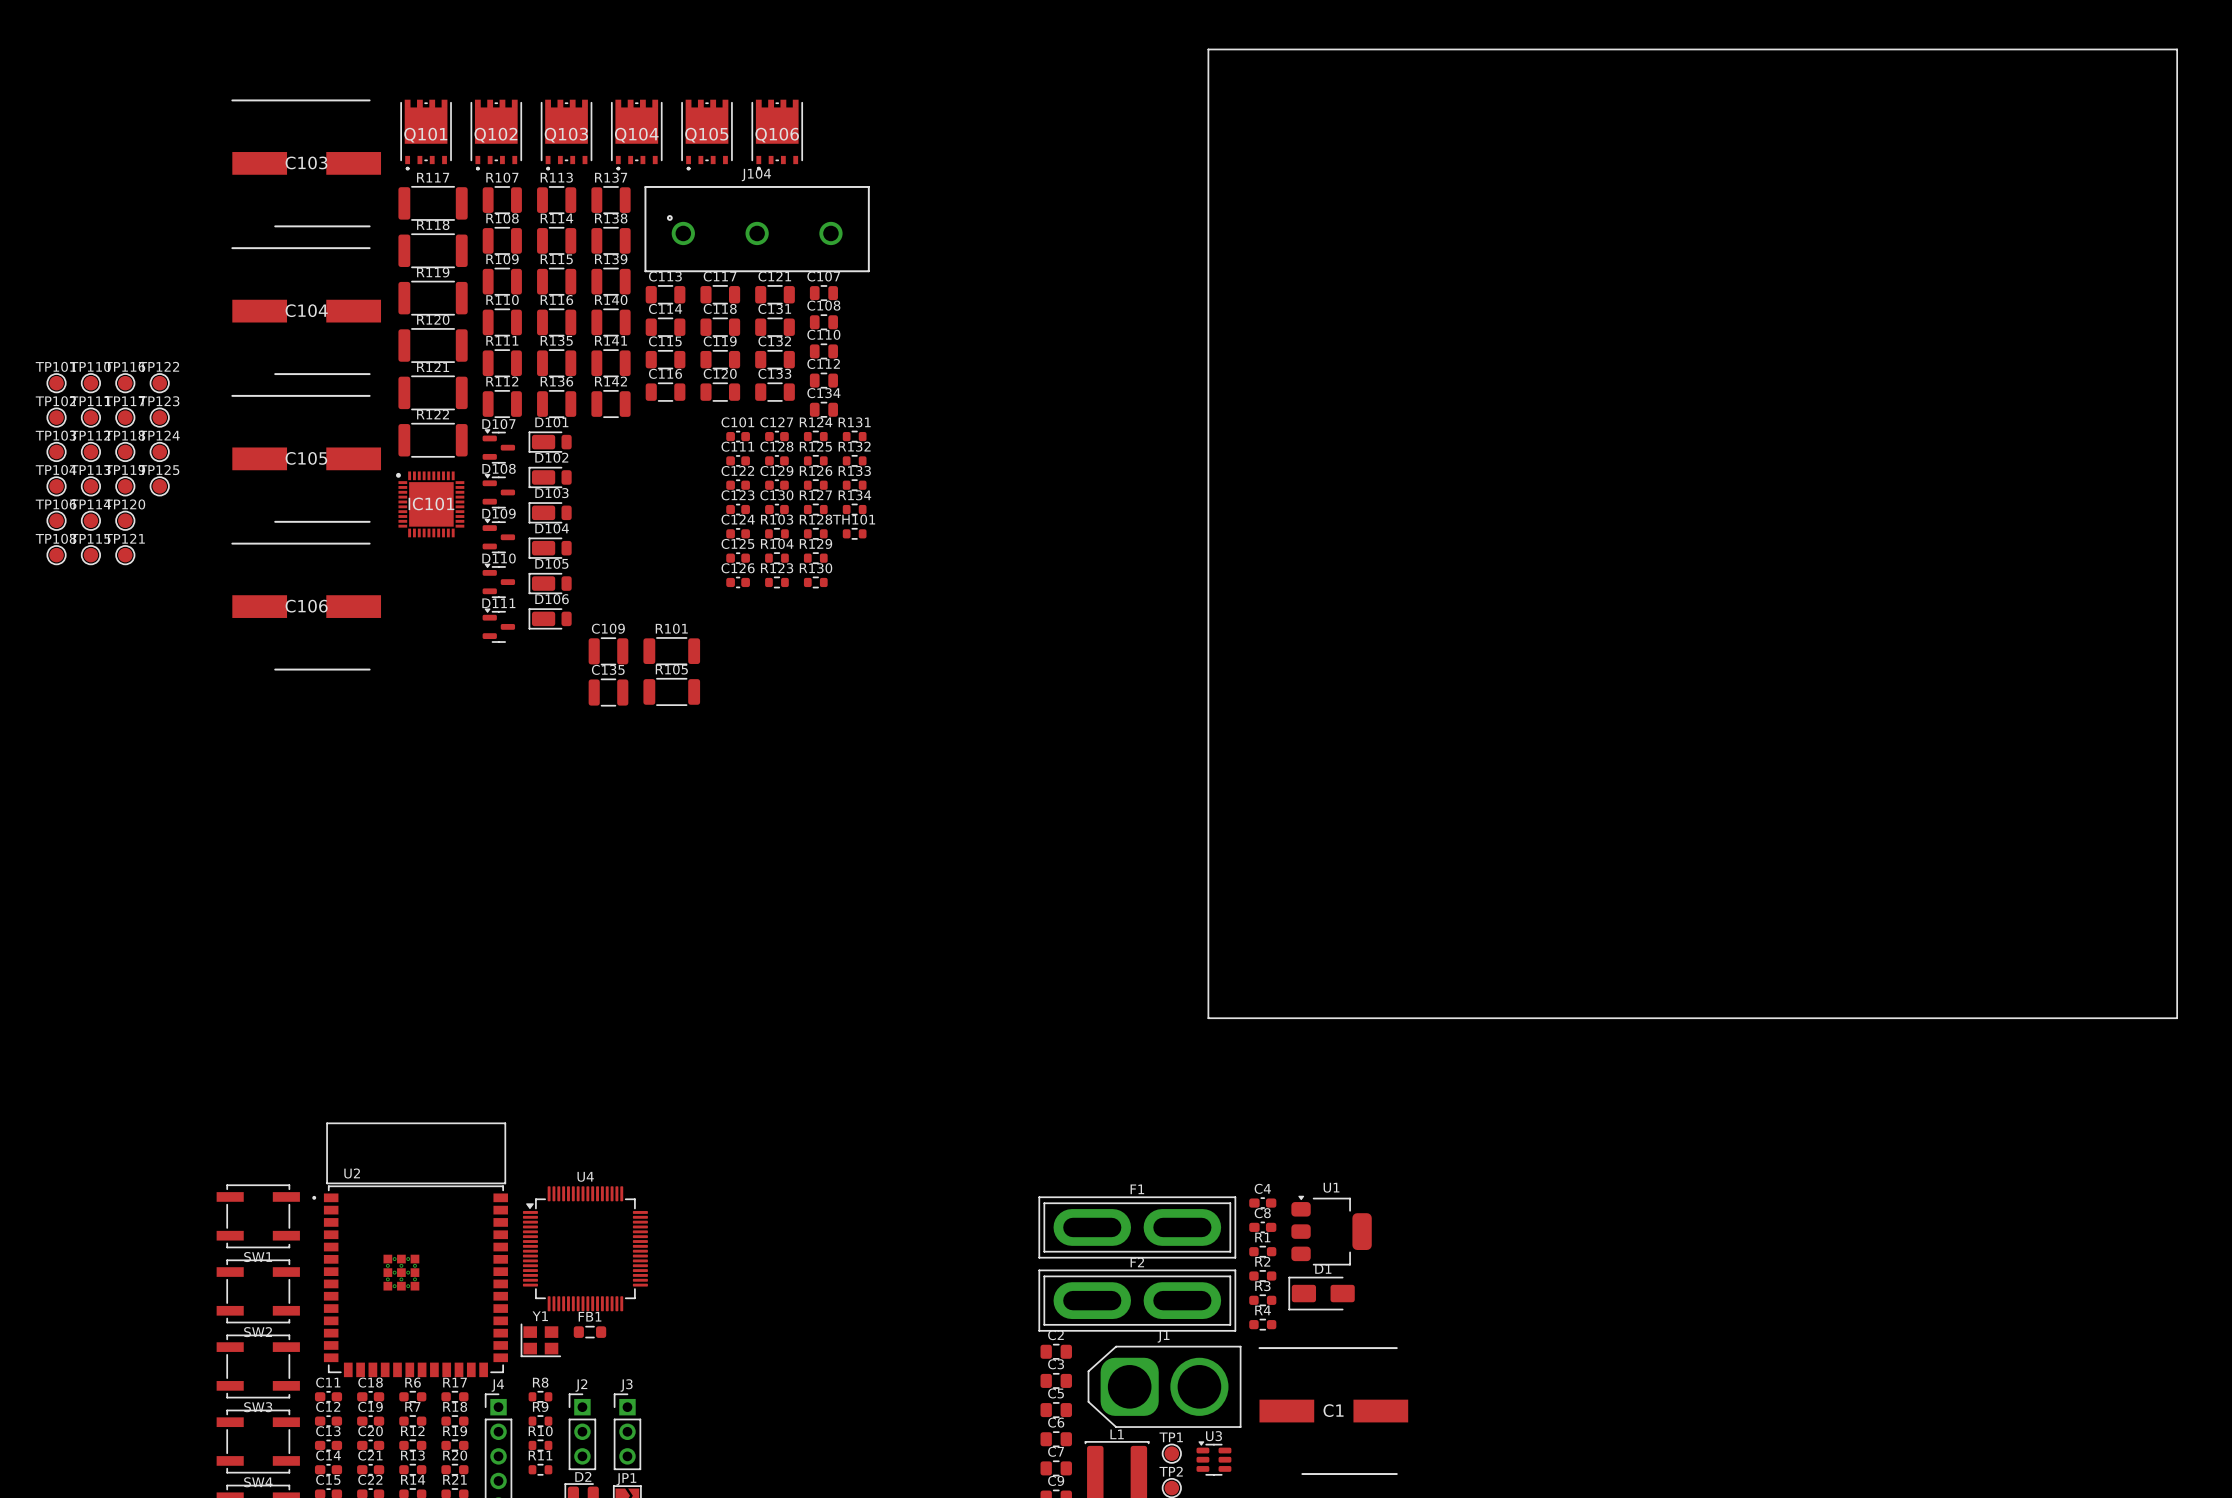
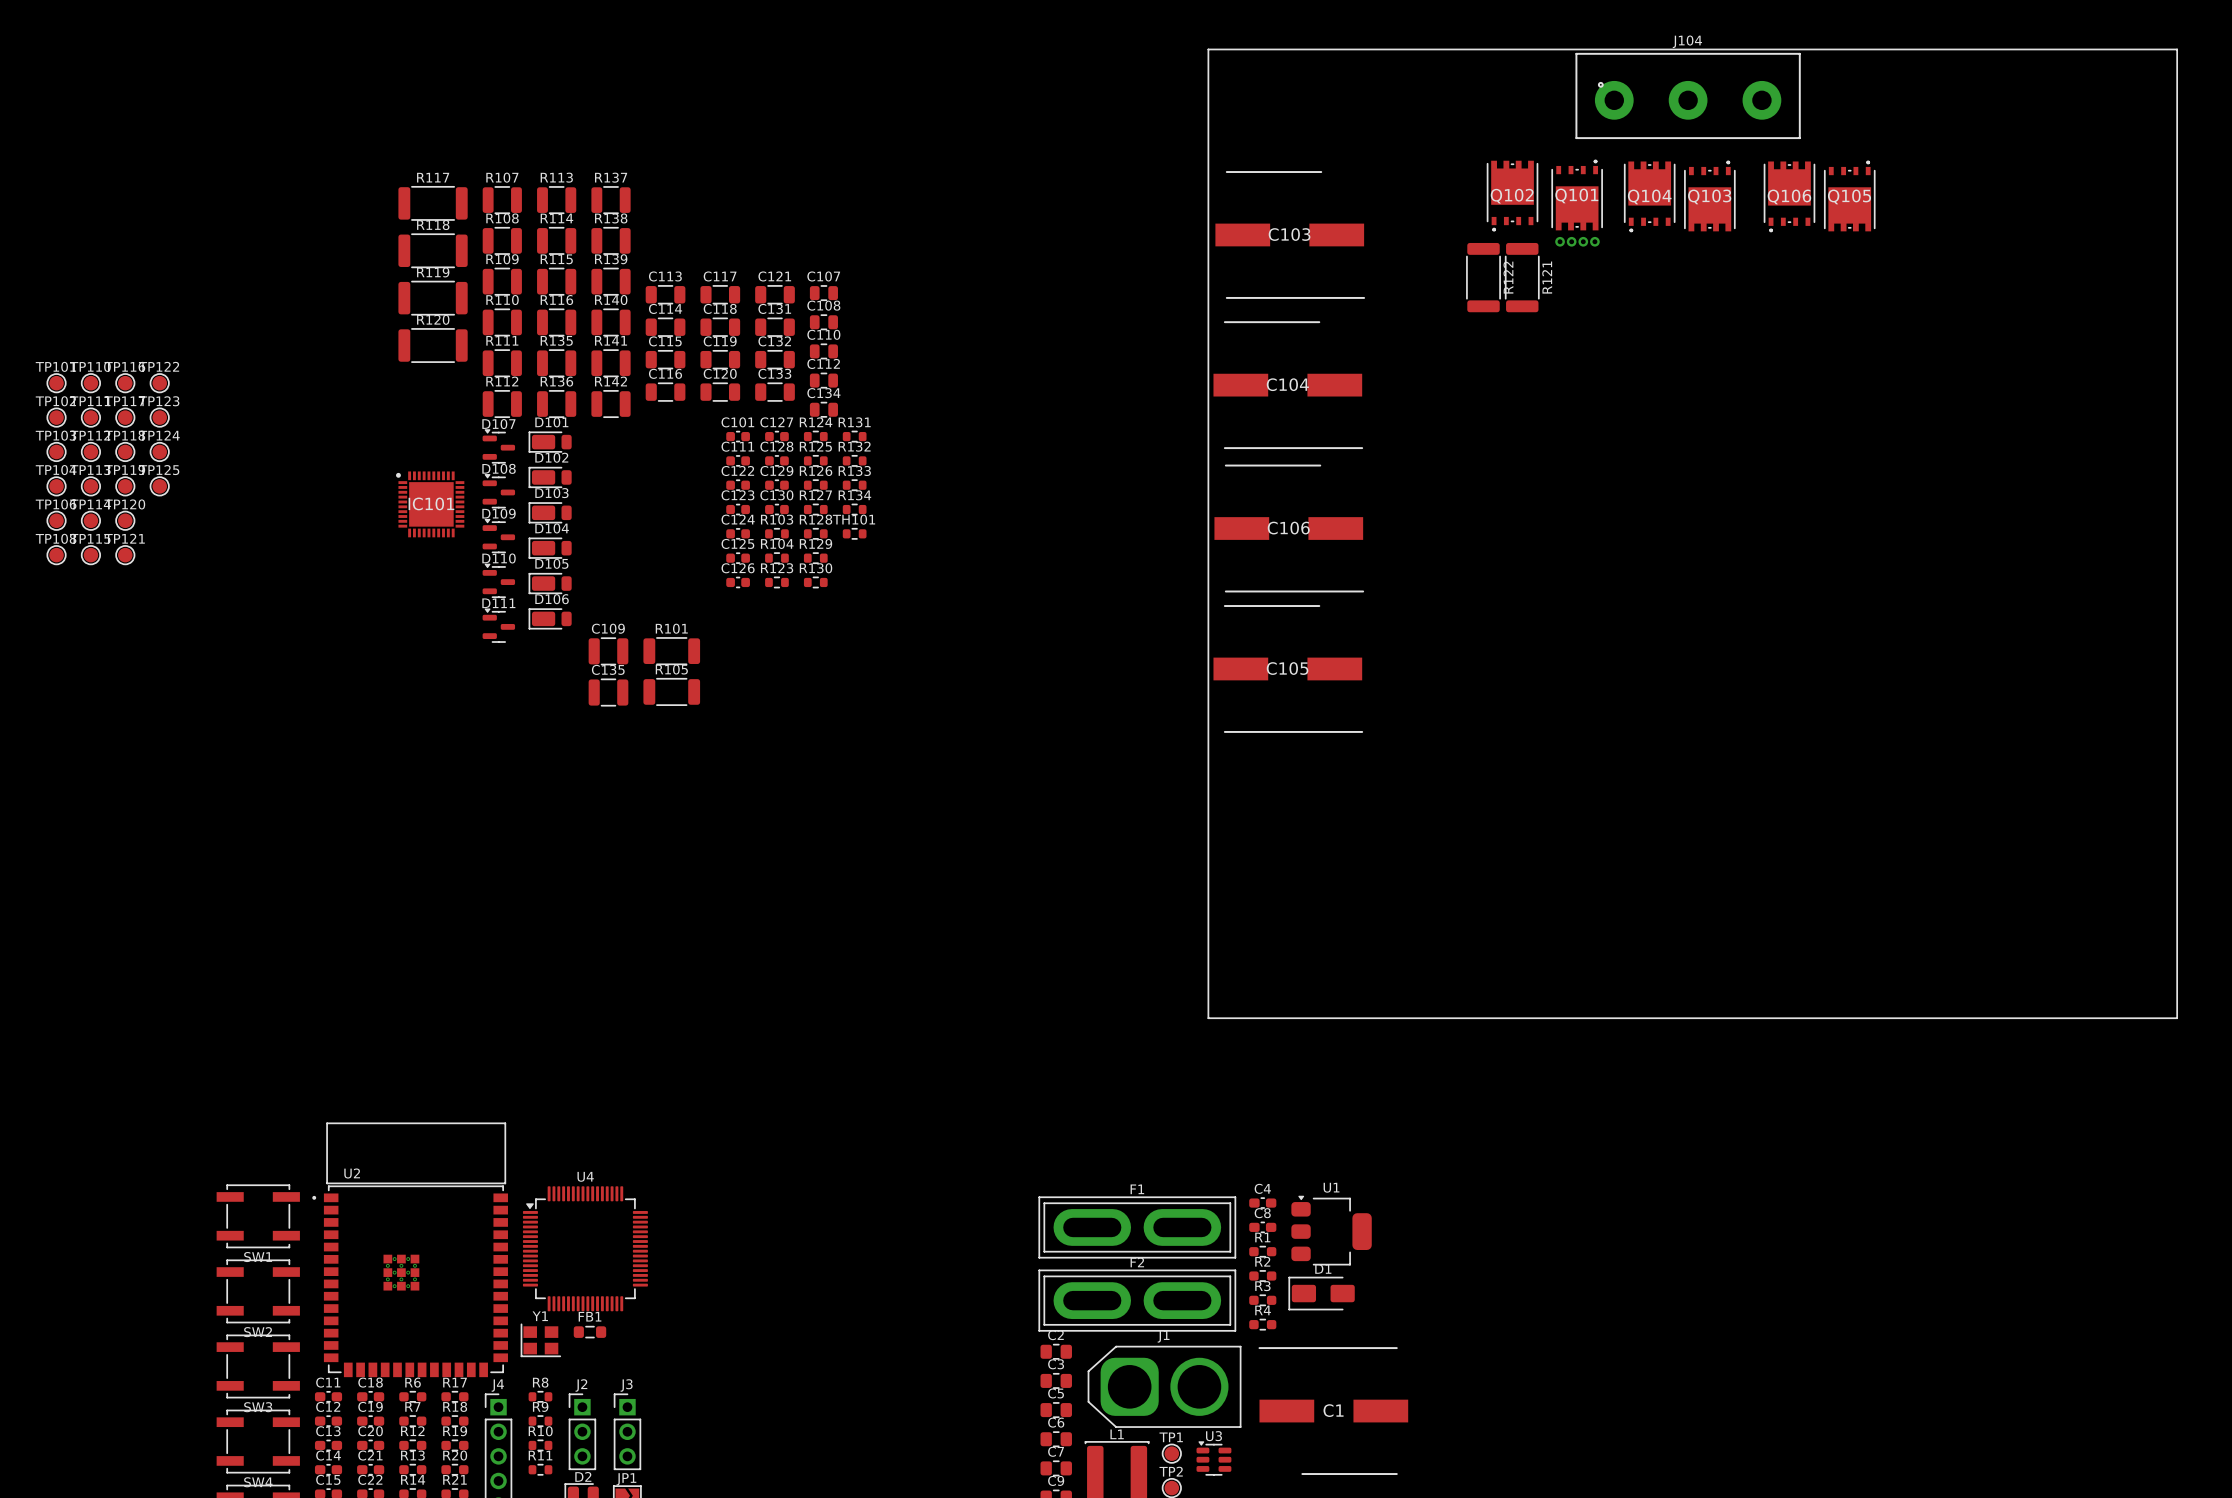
Q101 rotation: 0° (426, 135) -> 180° (1577, 194)
Q101 position: (426, 135) -> (1577, 194)
Q102 position: (496, 135) -> (1512, 196)
Q103 rotation: 0° (566, 135) -> 180° (1709, 195)
Q103 position: (566, 135) -> (1709, 195)
Q104 position: (636, 135) -> (1649, 196)
Q105 rotation: 0° (707, 135) -> 180° (1849, 195)
Q105 position: (707, 135) -> (1849, 195)
Q106 position: (777, 135) -> (1789, 196)
C103 rotation: 0° (306, 163) -> 180° (1290, 234)
C103 position: (306, 163) -> (1290, 234)
J104 footprint: [644, 186, 870, 273] -> [1575, 52, 1801, 140]
via: none -> (1560, 241)
via: none -> (1571, 241)
via: none -> (1583, 241)
via: none -> (1594, 241)
C104 rotation: 0° (306, 311) -> 180° (1288, 385)
C104 position: (306, 311) -> (1288, 385)
R121 rotation: 0° (433, 392) -> 90° clockwise (1522, 277)
R121 position: (433, 392) -> (1522, 277)
R122 rotation: 0° (433, 440) -> 90° clockwise (1483, 277)
R122 position: (433, 440) -> (1483, 277)
C105 rotation: 0° (306, 458) -> 180° (1288, 668)
C105 position: (306, 458) -> (1288, 668)
C106 rotation: 0° (306, 606) -> 180° (1289, 528)
C106 position: (306, 606) -> (1289, 528)

